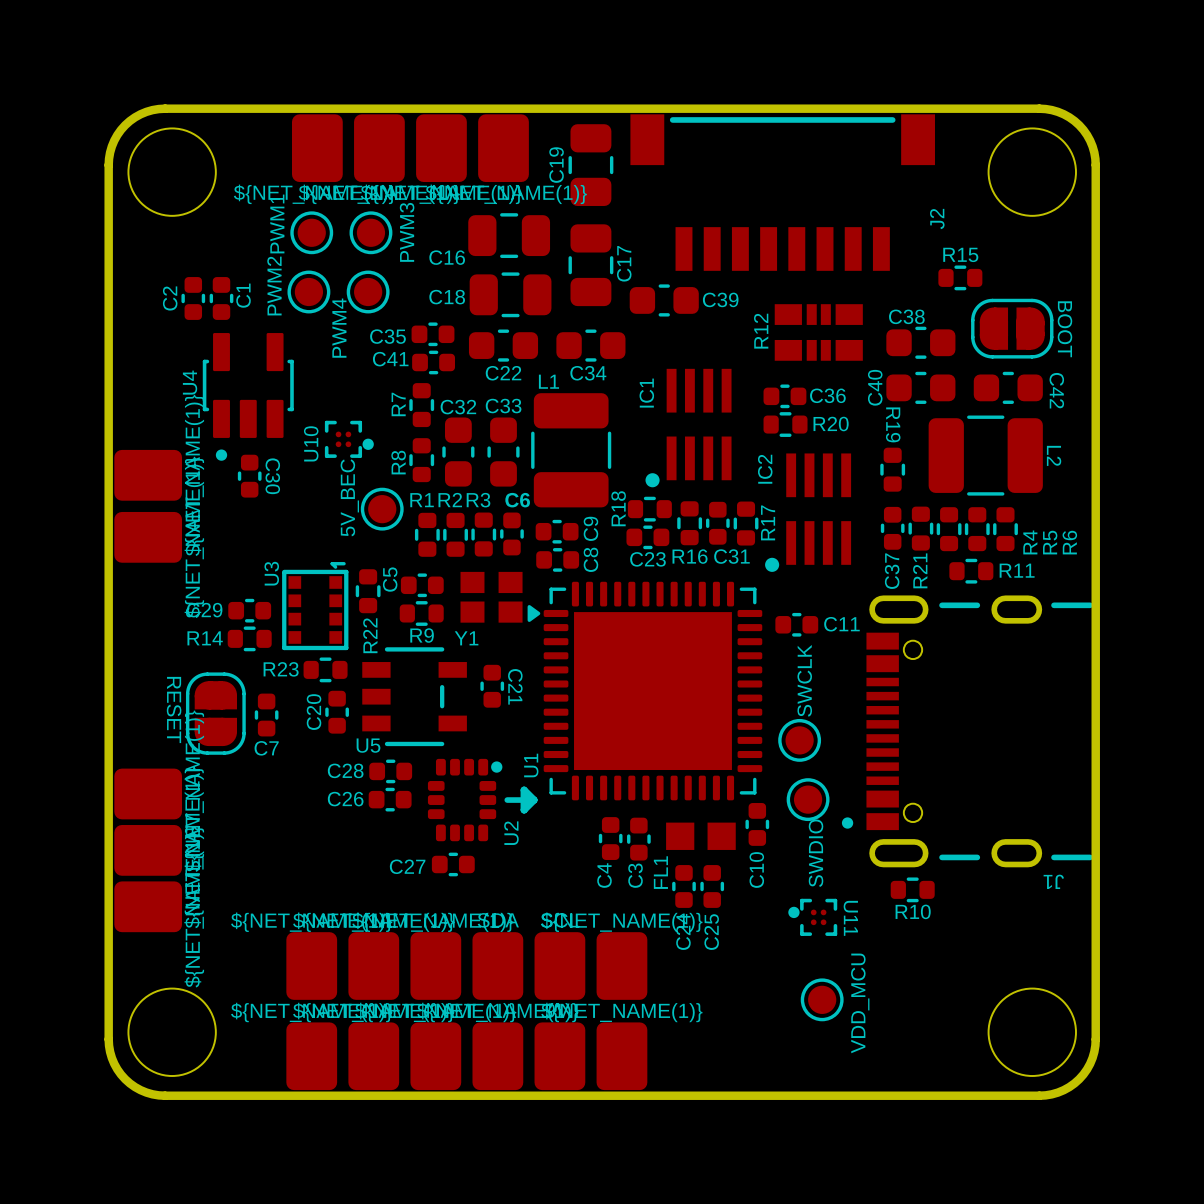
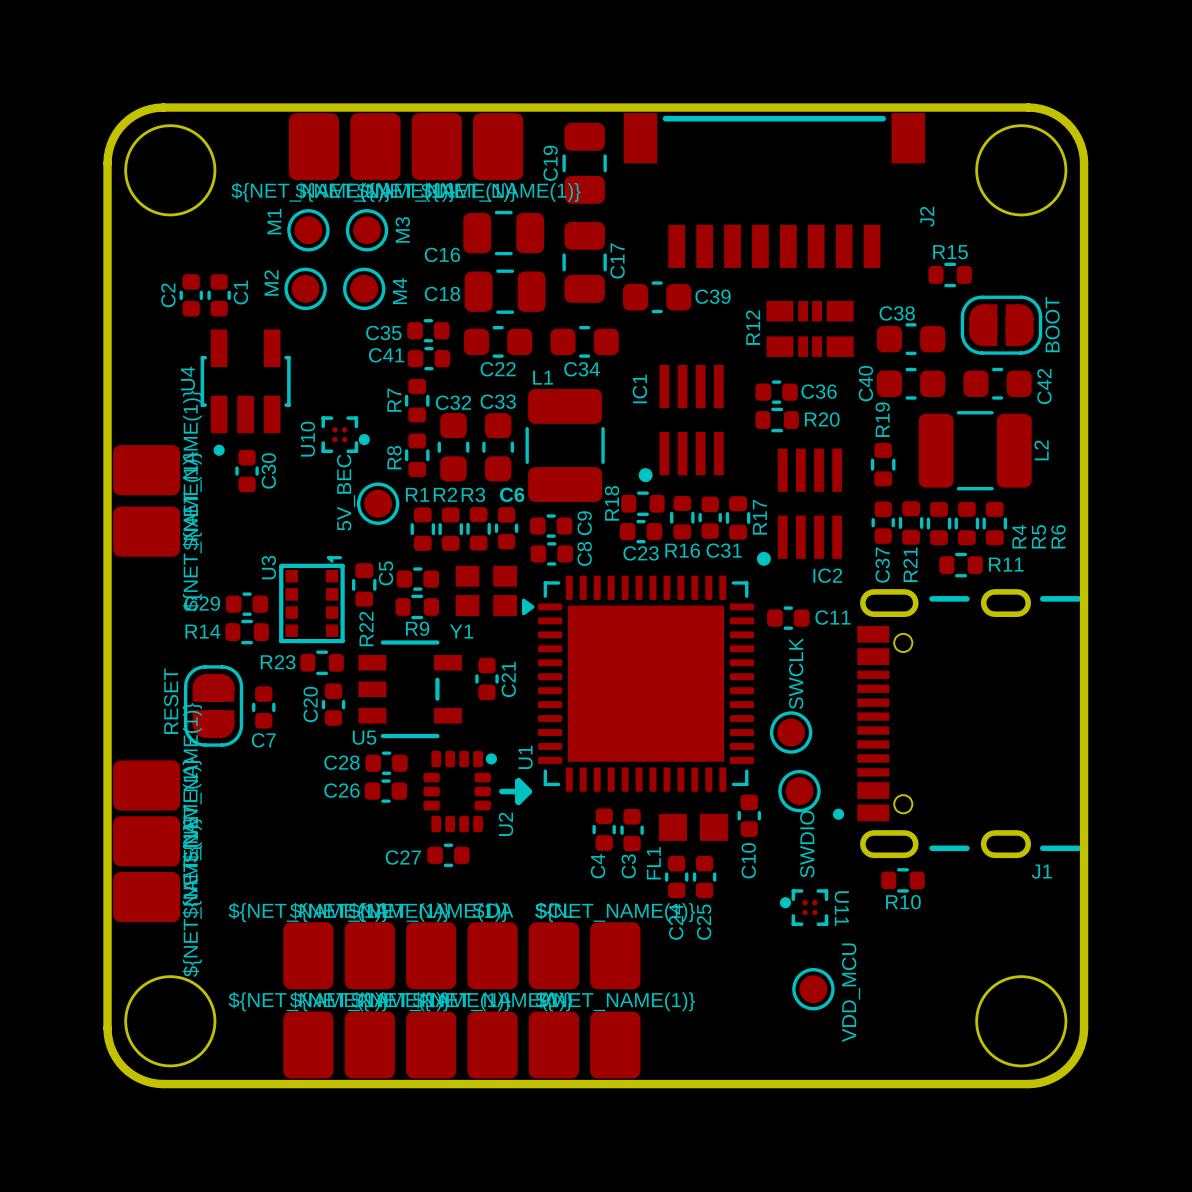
part footprint: [104, 104, 1100, 1100] -> [103, 103, 1089, 1089]
part value: PWM1 (277, 223) -> M1 (274, 221)
part value: PWM3 (407, 232) -> M3 (402, 229)
part value: PWM2 (274, 286) -> M2 (271, 282)
part value: PWM4 (339, 328) -> M4 (399, 291)
part value rotation: 0° (1064, 329) -> 180° (1052, 324)
C42 name rotation: 0° (1056, 390) -> 180° (1044, 386)
R19 name rotation: 0° (893, 424) -> 180° (882, 419)
L2 name rotation: 0° (1054, 455) -> 180° (1041, 450)
IC2 name rotation: 0° (765, 469) -> 90° clockwise (827, 575)
IC2 name position: IC2 (765, 469) -> IC2 (827, 575)
C30 name rotation: 0° (272, 476) -> 180° (268, 470)
C21 name rotation: 0° (515, 686) -> 180° (508, 679)
part value rotation: 0° (174, 709) -> 180° (171, 701)
J1 name rotation: 0° (1053, 881) -> 180° (1041, 871)

